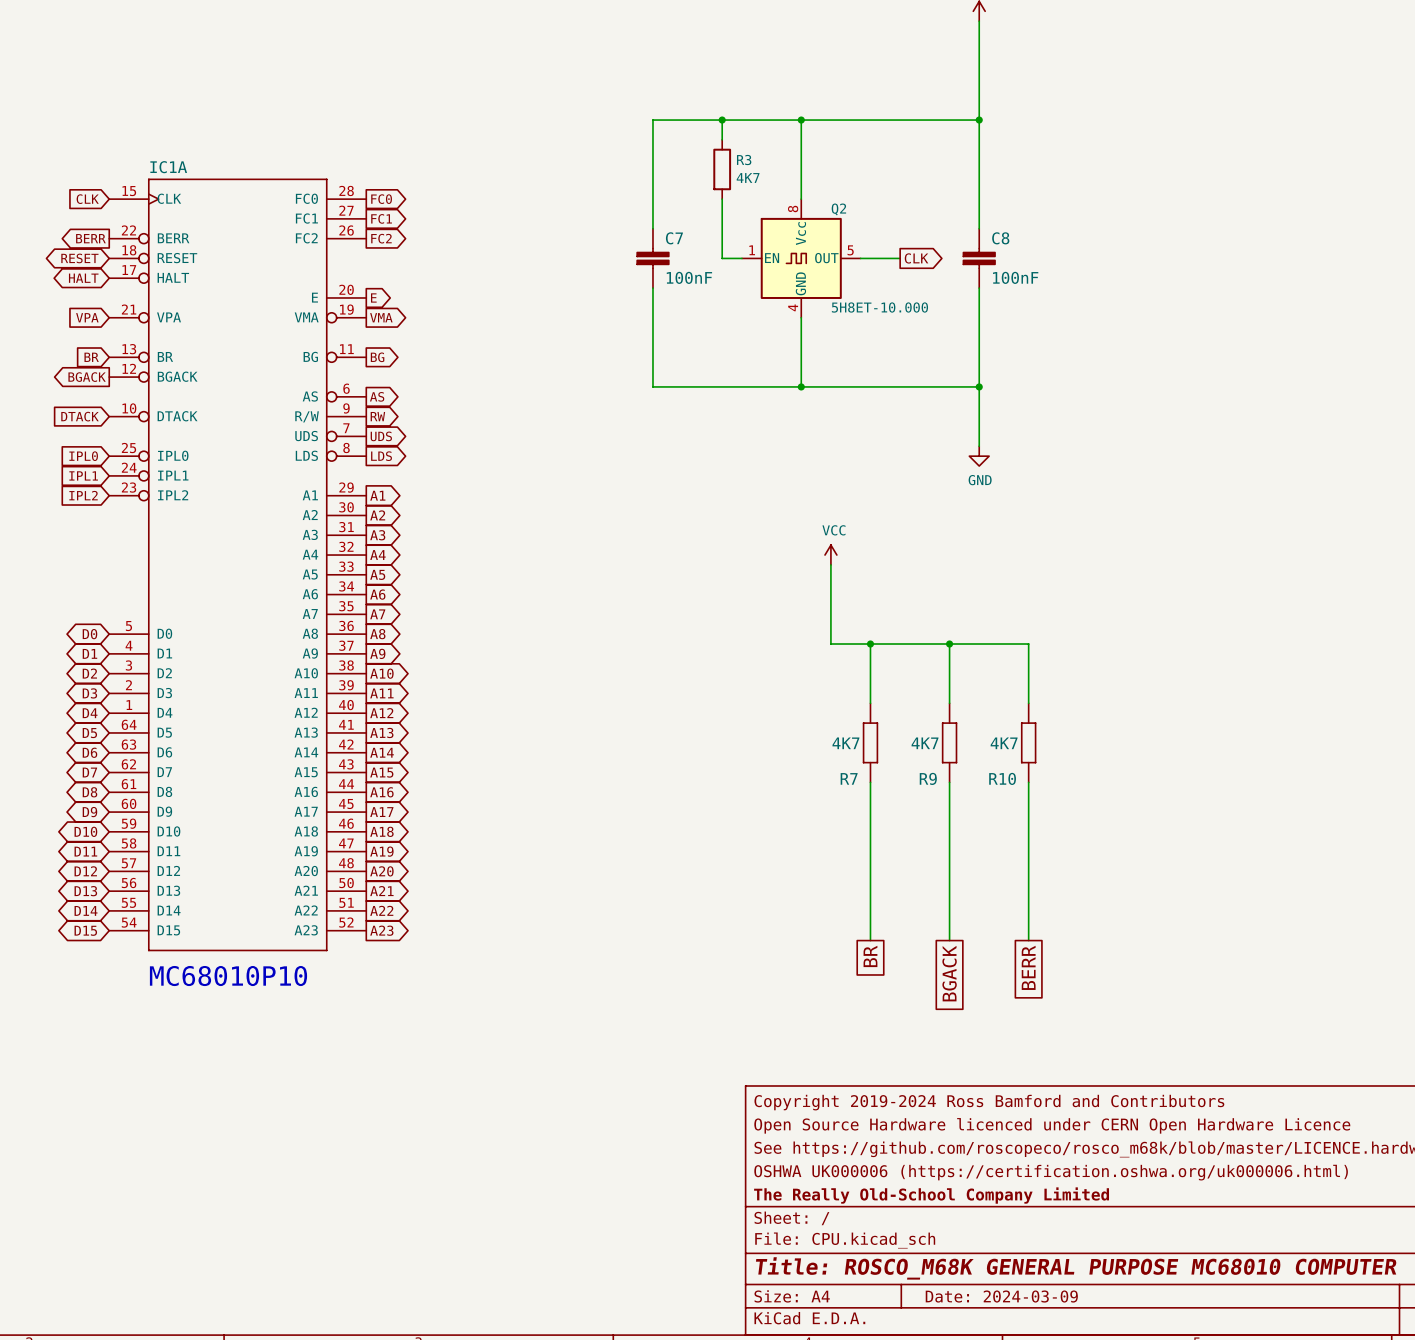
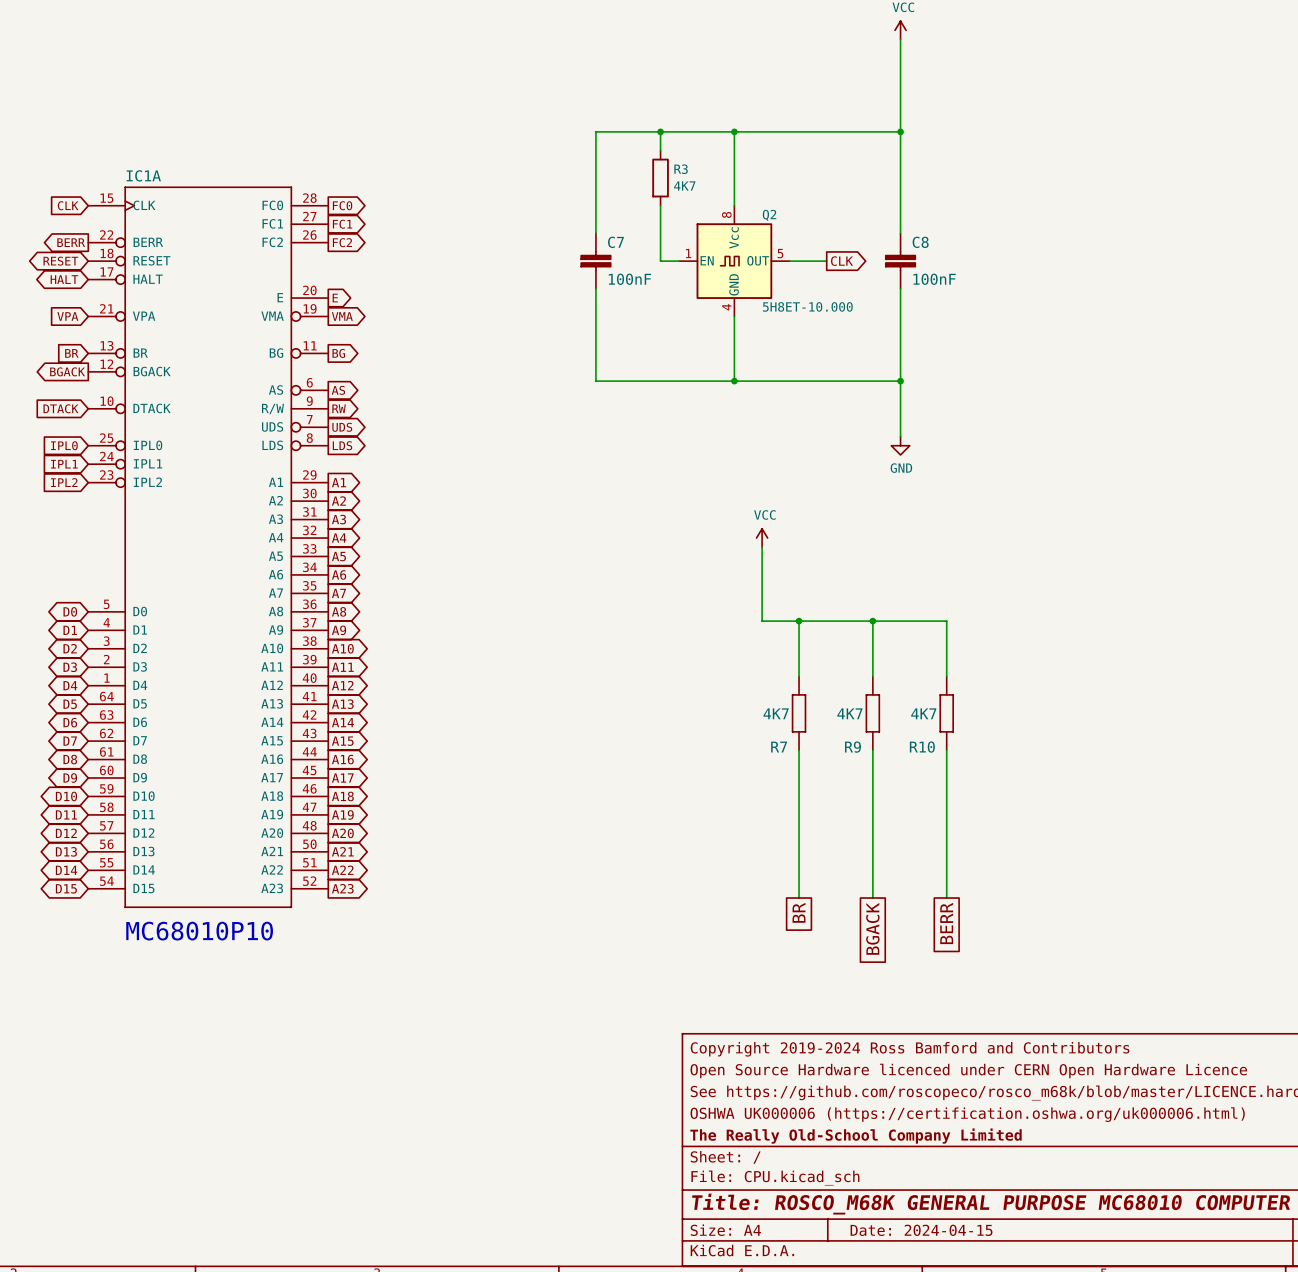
title block: Date: 2024-03-09 (1001, 1296) -> Date: 2024-04-15 (921, 1230)

